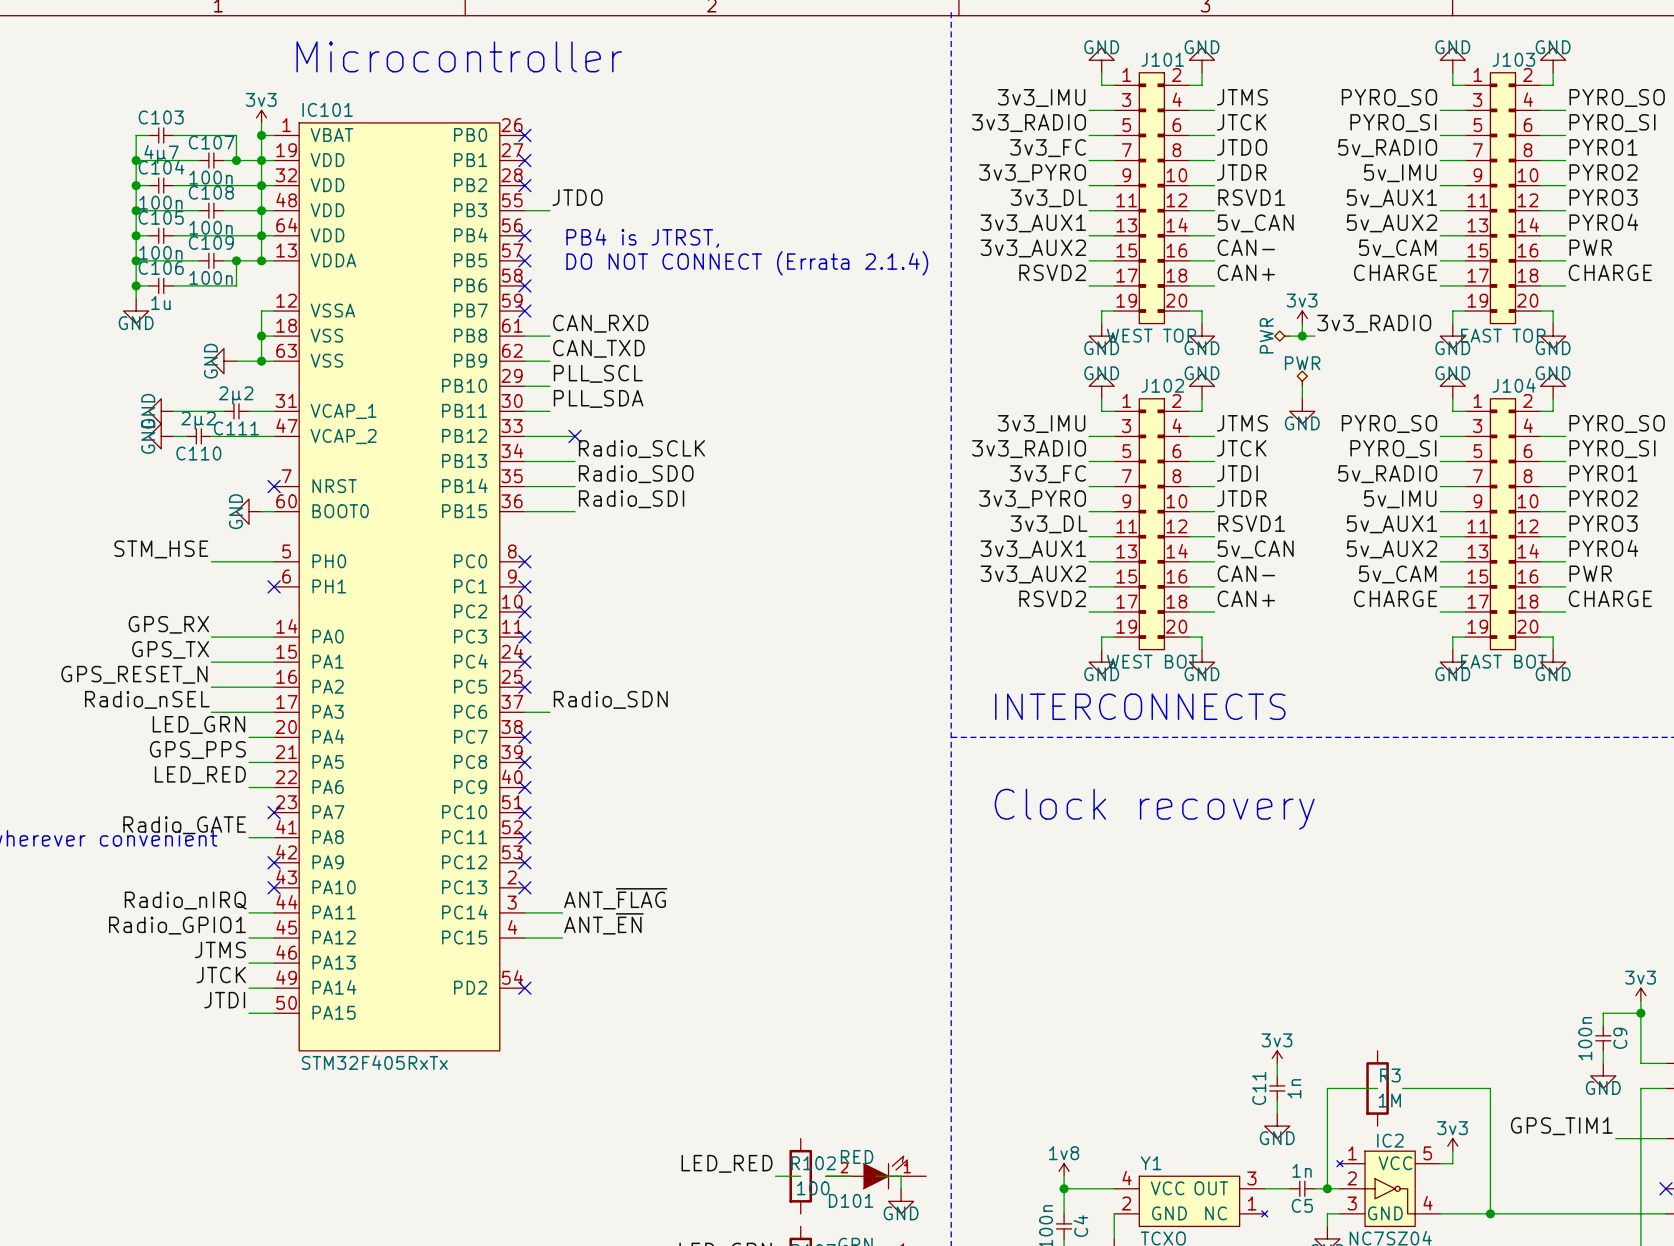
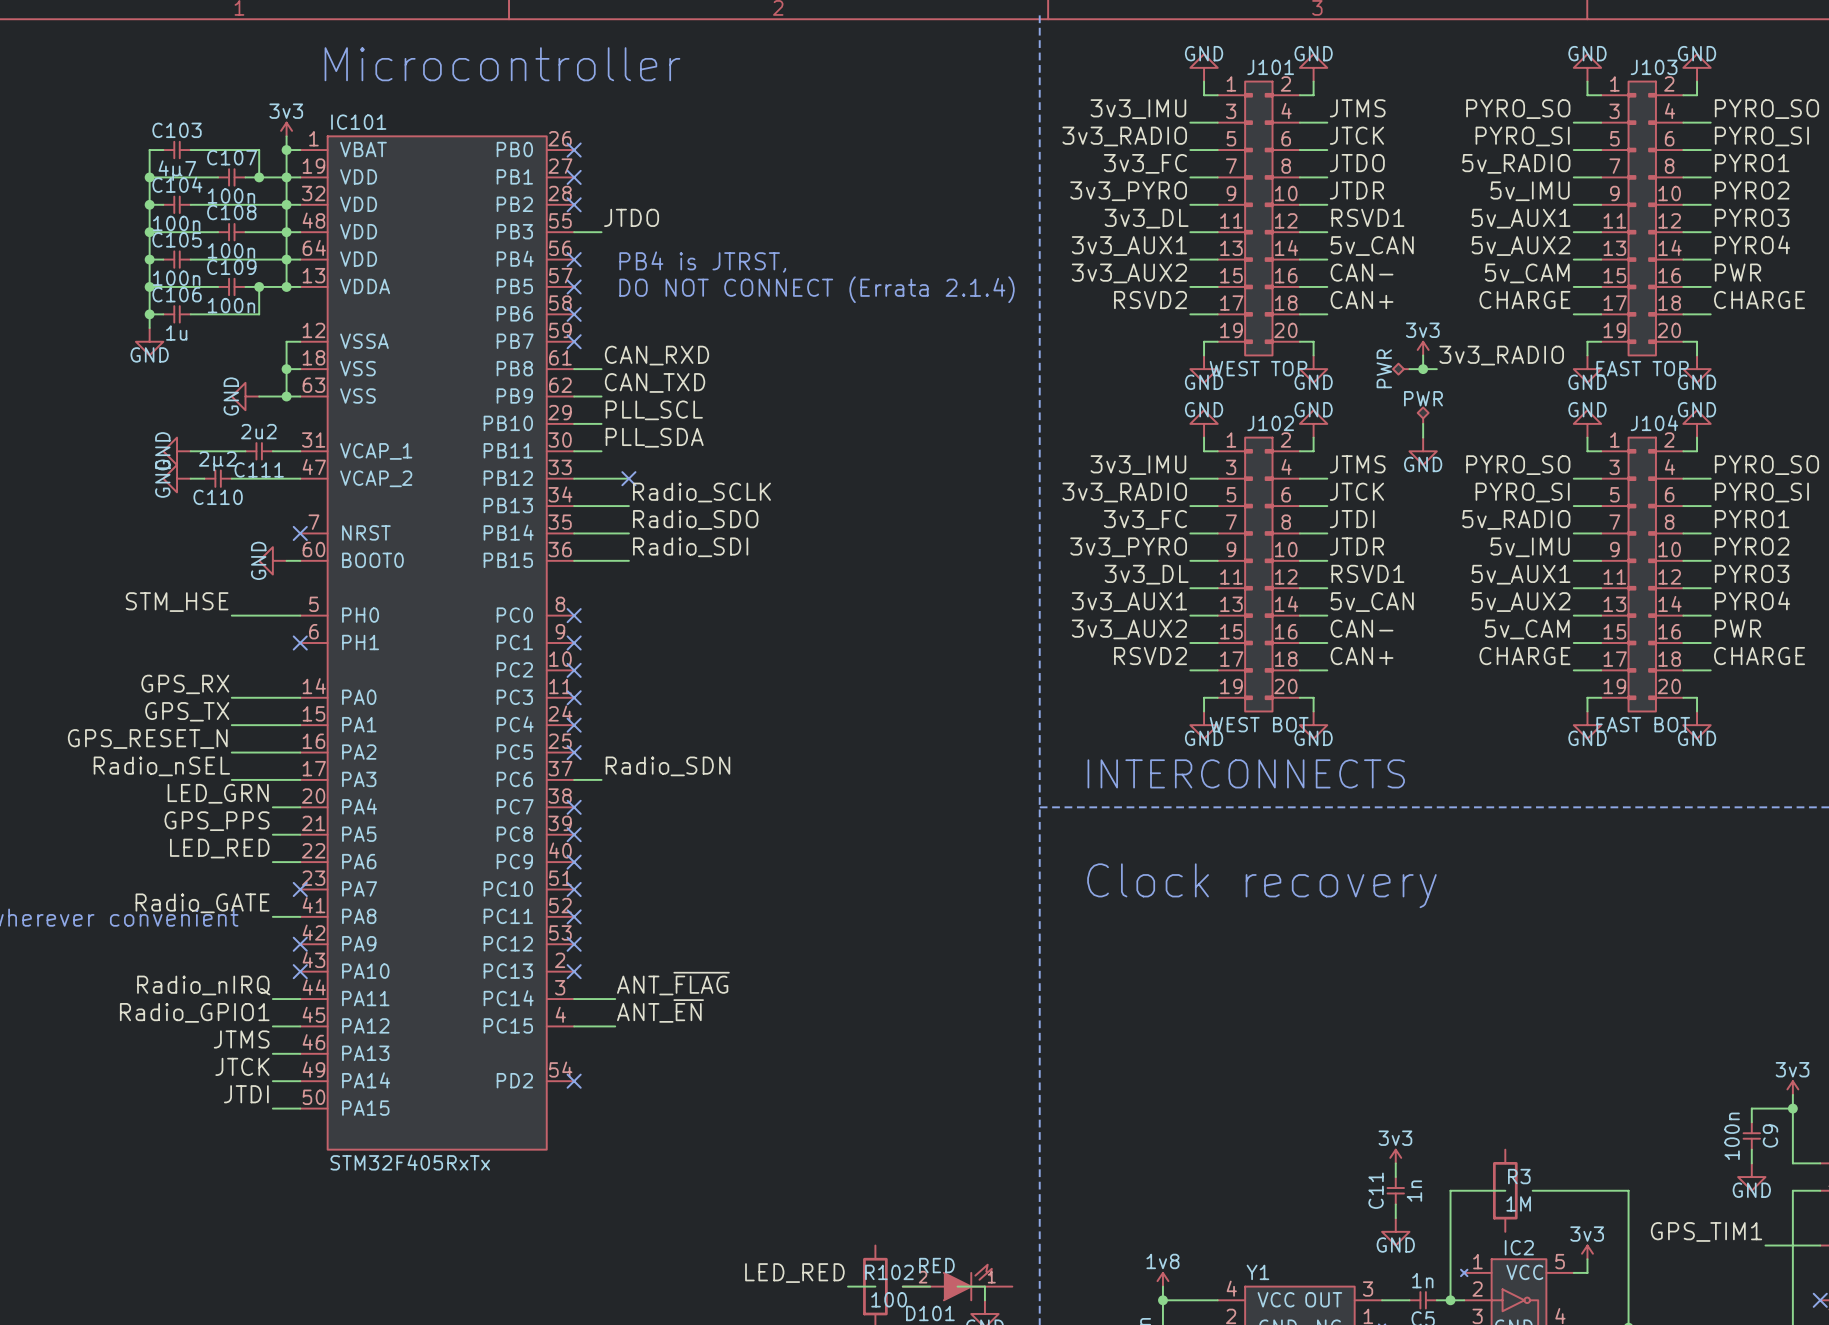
C111 value: 2µ2 (236, 395) -> 2u2 (258, 431)

